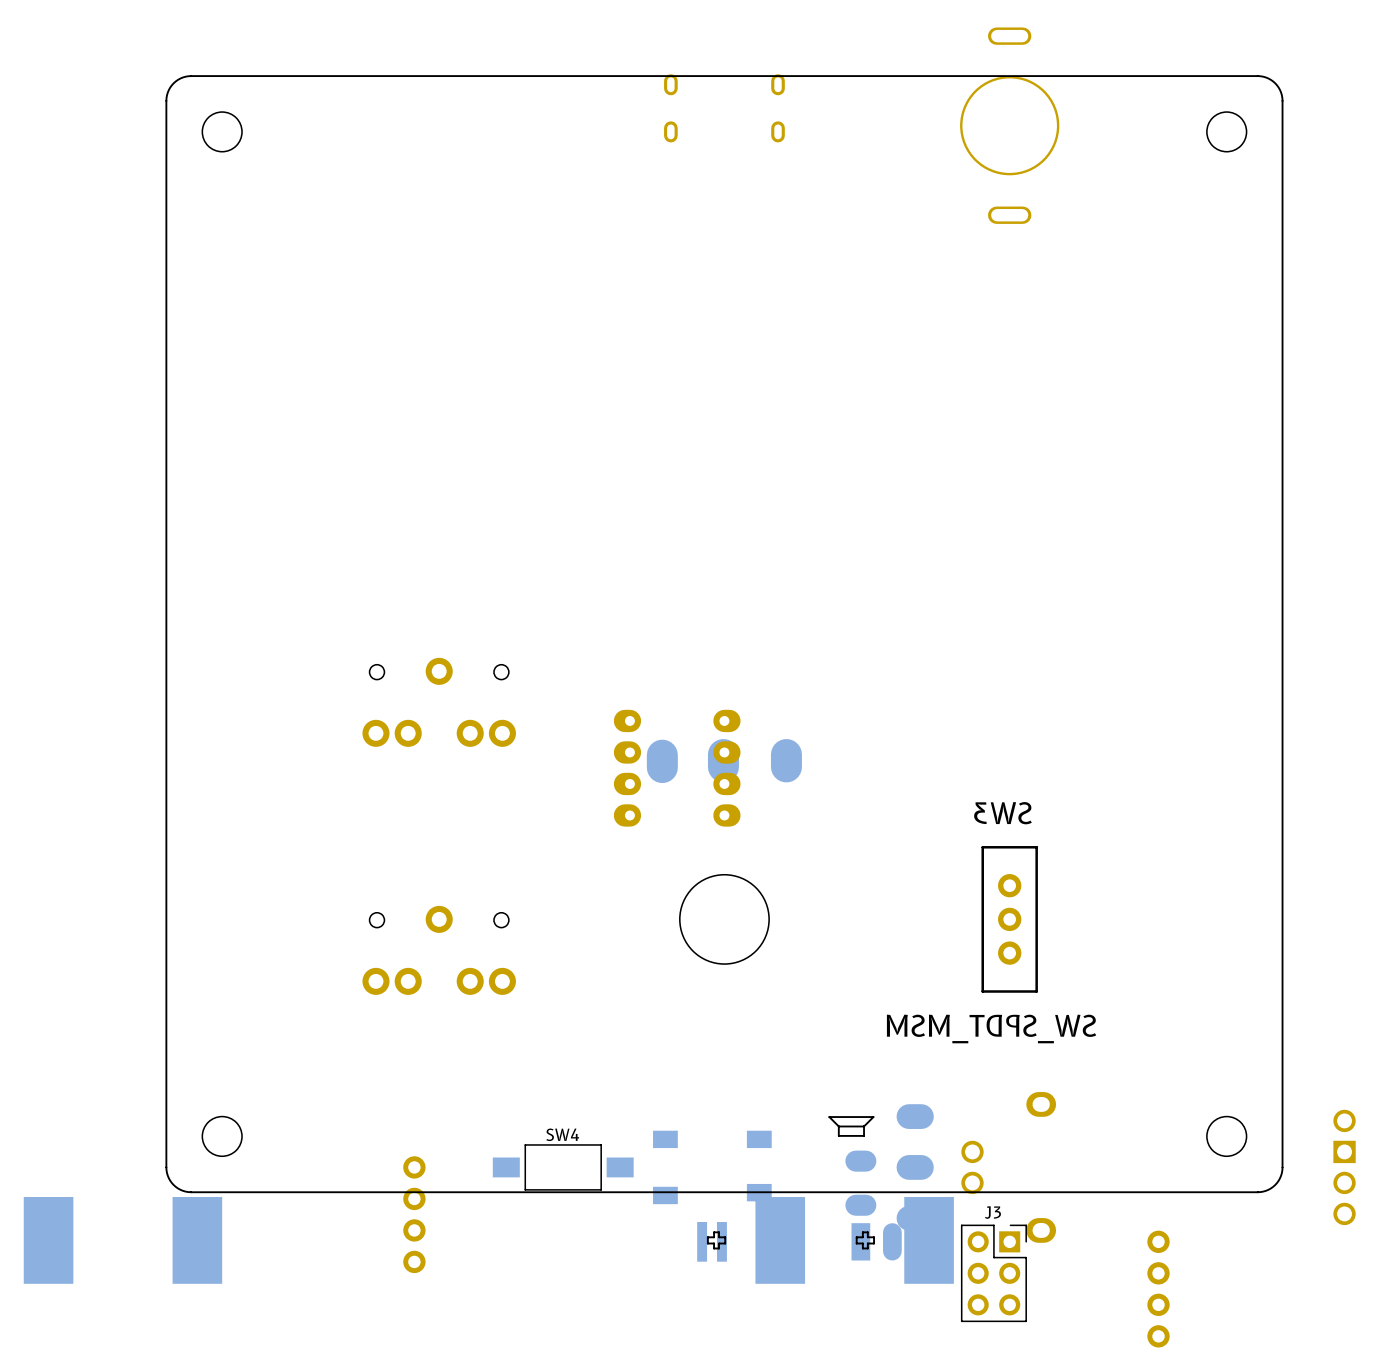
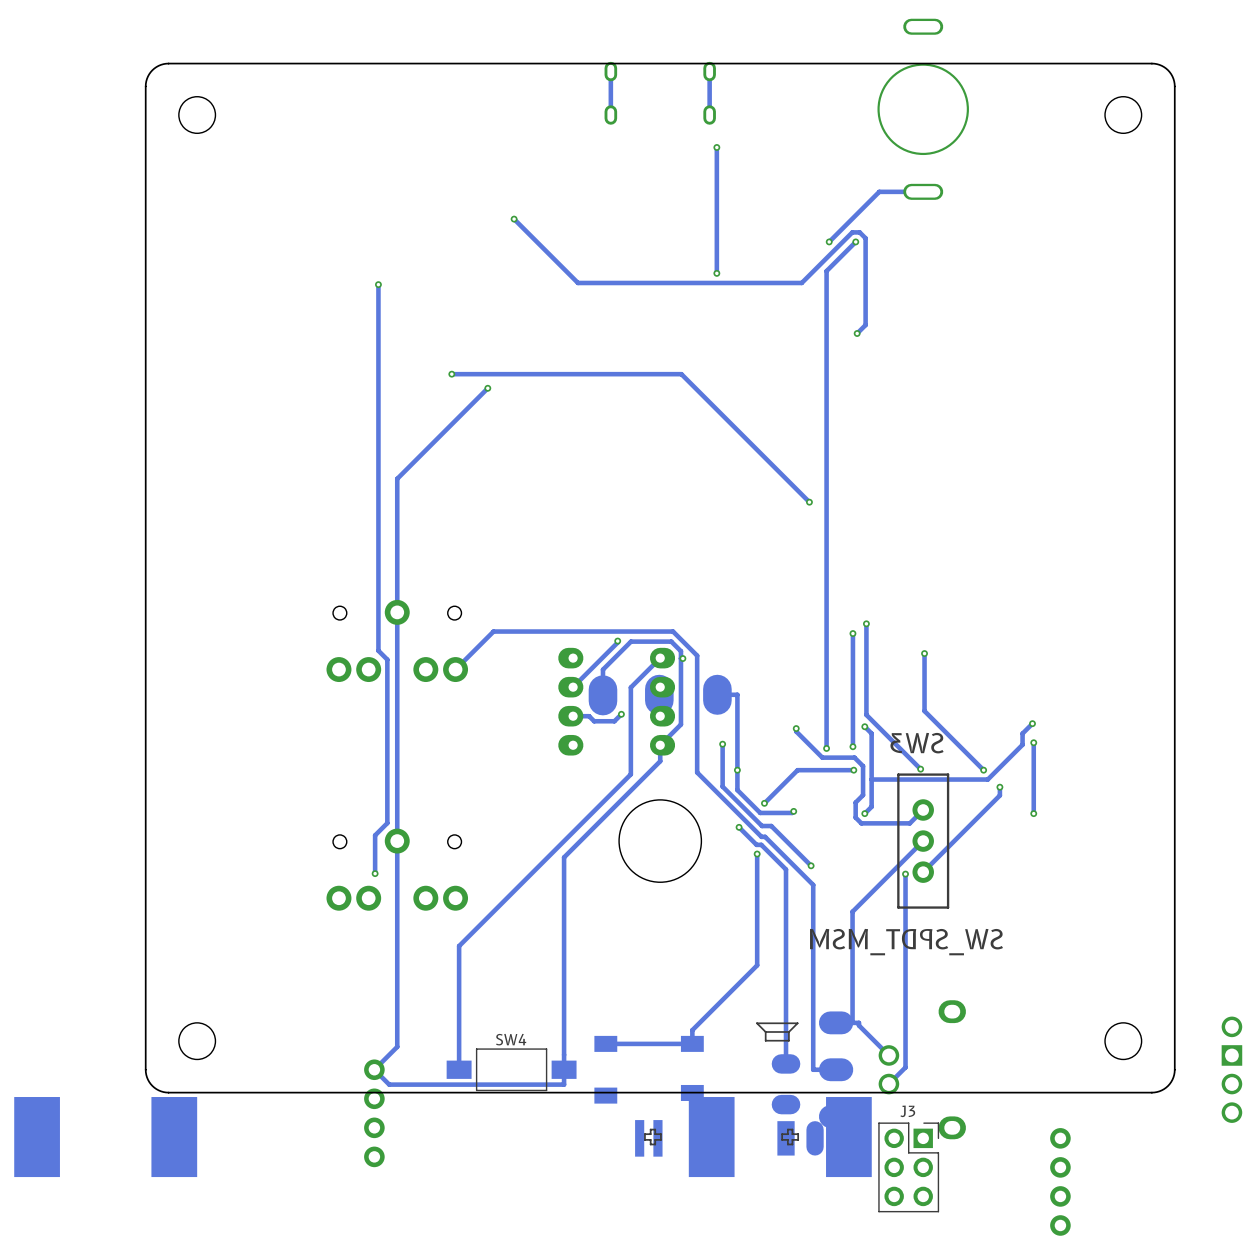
track: none -> (610, 71) (610, 115)
track: none -> (709, 71) (709, 115)
track: none -> (716, 147) (716, 273)
via: none -> (716, 147)
track: none -> (923, 191) (879, 191) (829, 241)
track: none -> (514, 219) (577, 282) (801, 282) (852, 232) (859, 232) (865, 238) (865, 325) (857, 333)
via: none -> (514, 219)
via: none -> (829, 241)
track: none -> (855, 241) (826, 271) (826, 748)
via: none -> (855, 241)
via: none -> (716, 273)
track: none -> (378, 284) (378, 650) (387, 659) (387, 823) (375, 835) (375, 873)
via: none -> (378, 284)
via: none -> (857, 333)
track: none -> (451, 374) (681, 374) (809, 502)
via: none -> (451, 374)
track: none -> (487, 388) (397, 478) (397, 1046) (374, 1069) (389, 1084) (564, 1084) (564, 857) (660, 761) (660, 745) (680, 724) (680, 651) (671, 641) (630, 641) (602, 669) (602, 695)
via: none -> (487, 388)
via: none -> (809, 502)
track: none -> (866, 623) (866, 714) (920, 769)
via: none -> (866, 623)
track: none -> (852, 633) (852, 746)
via: none -> (852, 633)
track: none -> (617, 641) (573, 687)
via: none -> (617, 641)
track: none -> (924, 653) (924, 711) (983, 770)
via: none -> (924, 653)
track: none -> (660, 658) (630, 687) (630, 774) (459, 946) (459, 1069)
via: none -> (682, 658)
track: none -> (455, 669) (493, 631) (673, 631) (697, 655) (697, 772) (813, 884) (813, 1069) (836, 1069)
track: none -> (717, 694) (737, 694) (737, 790) (760, 812) (793, 811)
track: none -> (621, 714) (614, 721) (594, 721) (589, 716) (573, 716)
via: none -> (621, 714)
track: none -> (1032, 723) (1022, 733) (1022, 744) (987, 779) (871, 779)
via: none -> (1032, 723)
track: none -> (864, 726) (871, 733) (871, 806) (864, 813)
via: none -> (864, 726)
track: none -> (796, 728) (796, 731) (822, 757) (854, 757) (863, 766) (863, 795) (855, 802) (855, 817) (861, 823) (909, 823) (923, 809)
via: none -> (796, 728)
track: none -> (1033, 742) (1033, 813)
via: none -> (1033, 742)
track: none -> (722, 744) (722, 786) (762, 826) (771, 826) (811, 865)
via: none -> (722, 744)
via: none -> (852, 746)
via: none -> (826, 748)
via: none -> (920, 769)
via: none -> (737, 770)
track: none -> (853, 770) (797, 770) (764, 803)
via: none -> (853, 770)
via: none -> (983, 770)
track: none -> (999, 787) (999, 795) (923, 872)
via: none -> (999, 787)
via: none -> (764, 803)
via: none -> (793, 811)
via: none -> (864, 813)
via: none -> (1033, 813)
track: none -> (739, 827) (756, 844) (761, 844) (786, 869) (786, 1063)
via: none -> (739, 827)
track: none -> (923, 841) (852, 911) (852, 1022)
track: none -> (757, 854) (757, 965) (692, 1030) (692, 1043) (605, 1043)
via: none -> (757, 854)
via: none -> (811, 865)
via: none -> (375, 873)
track: none -> (905, 874) (905, 1067) (888, 1084)
via: none -> (905, 874)
track: none -> (836, 1022) (858, 1022) (858, 1025) (888, 1055)

